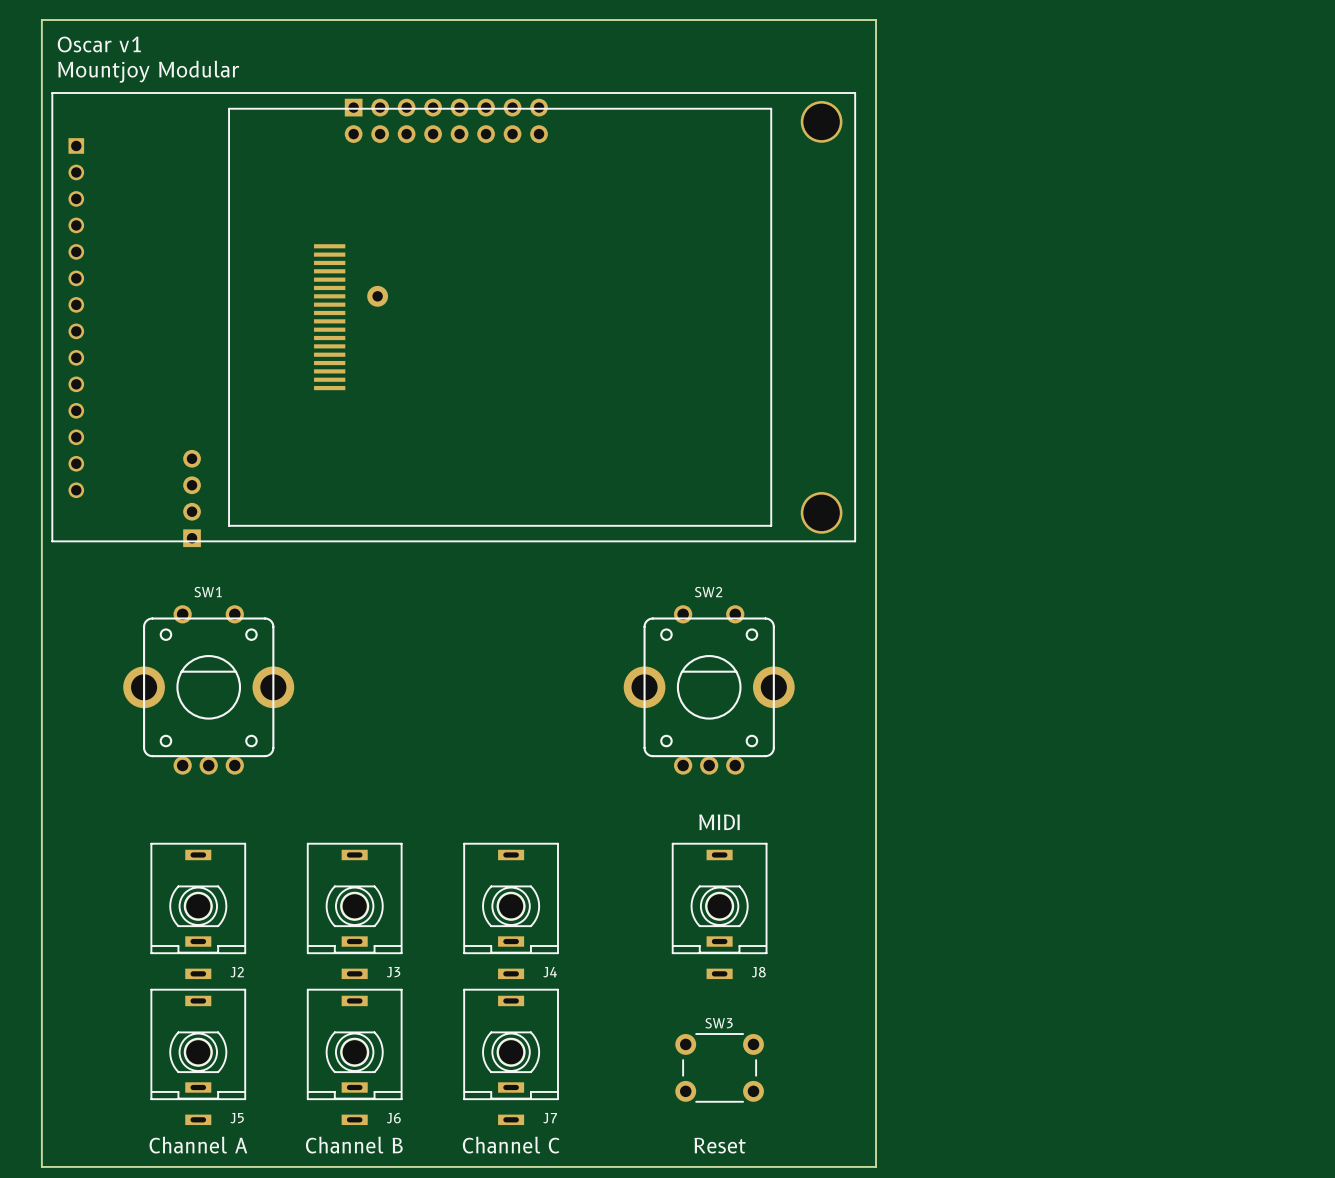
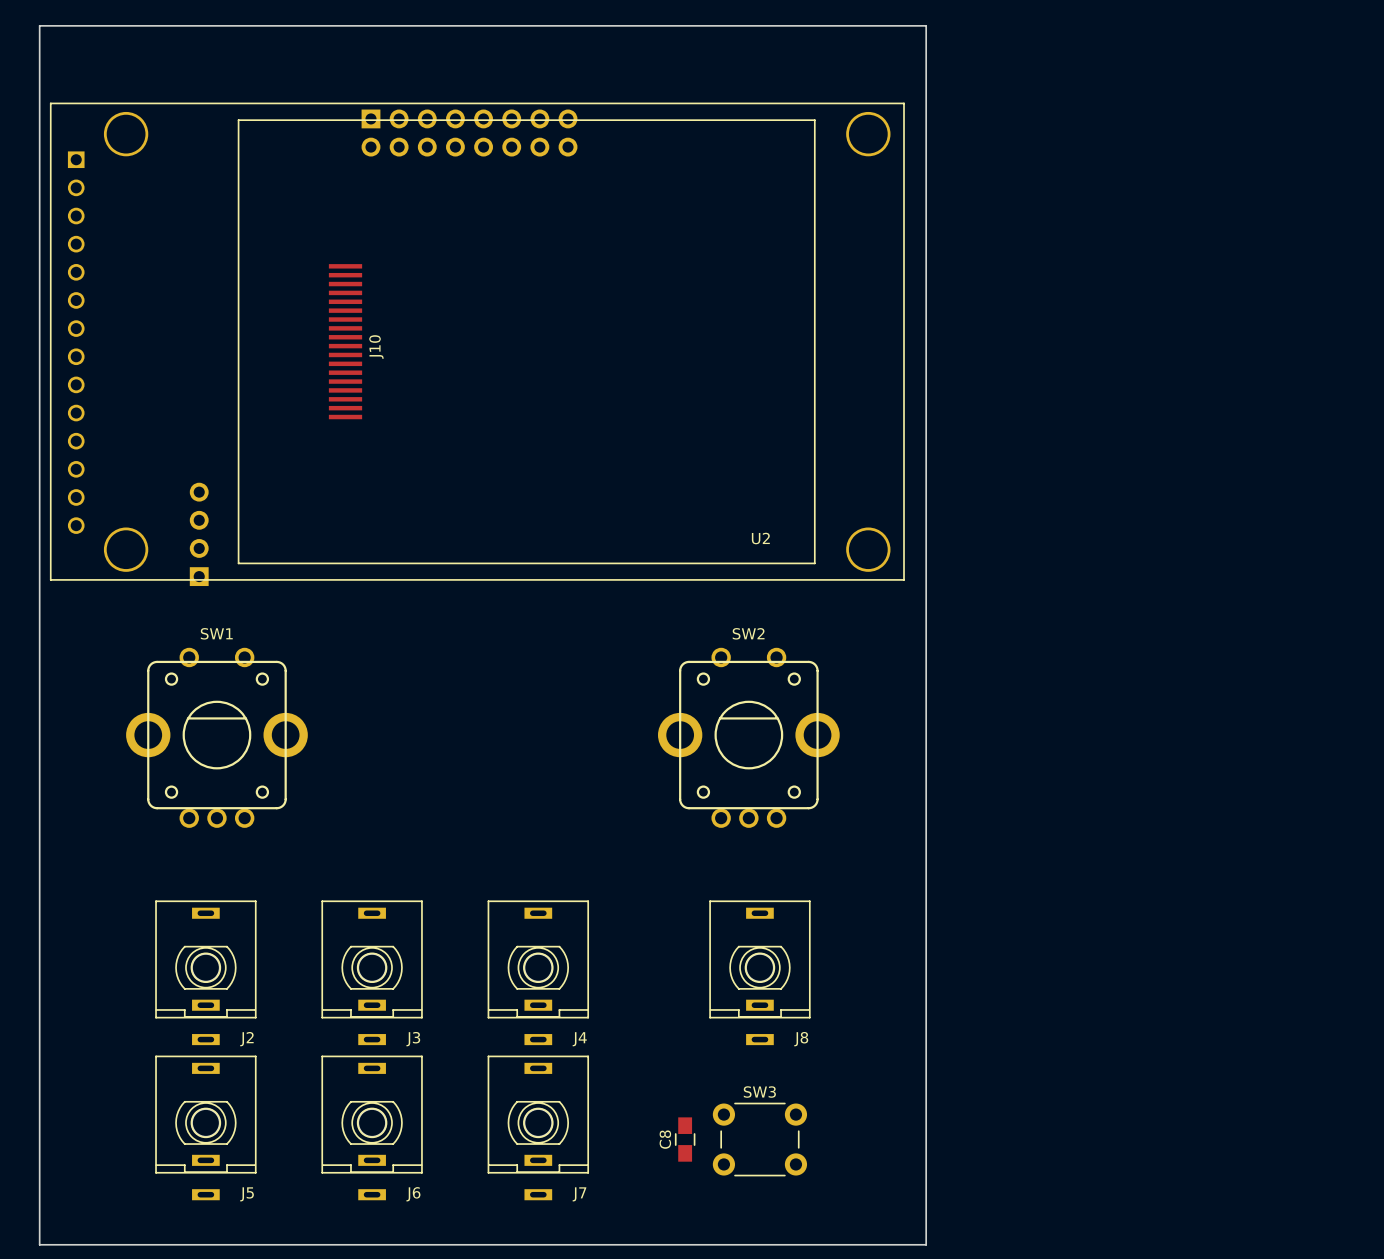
text: Oscar v1 (99, 44) -> none
text: Mountjoy Modular (148, 71) -> none
part: (377, 296) -> none
U2: none -> (477, 341)
J10 name: none -> J10 (376, 347)
text: MIDI (719, 822) -> none
C8: none -> (685, 1139)
text: Channel A (198, 1145) -> none
text: Channel B (354, 1145) -> none
text: Channel C (511, 1145) -> none
text: Reset (720, 1145) -> none

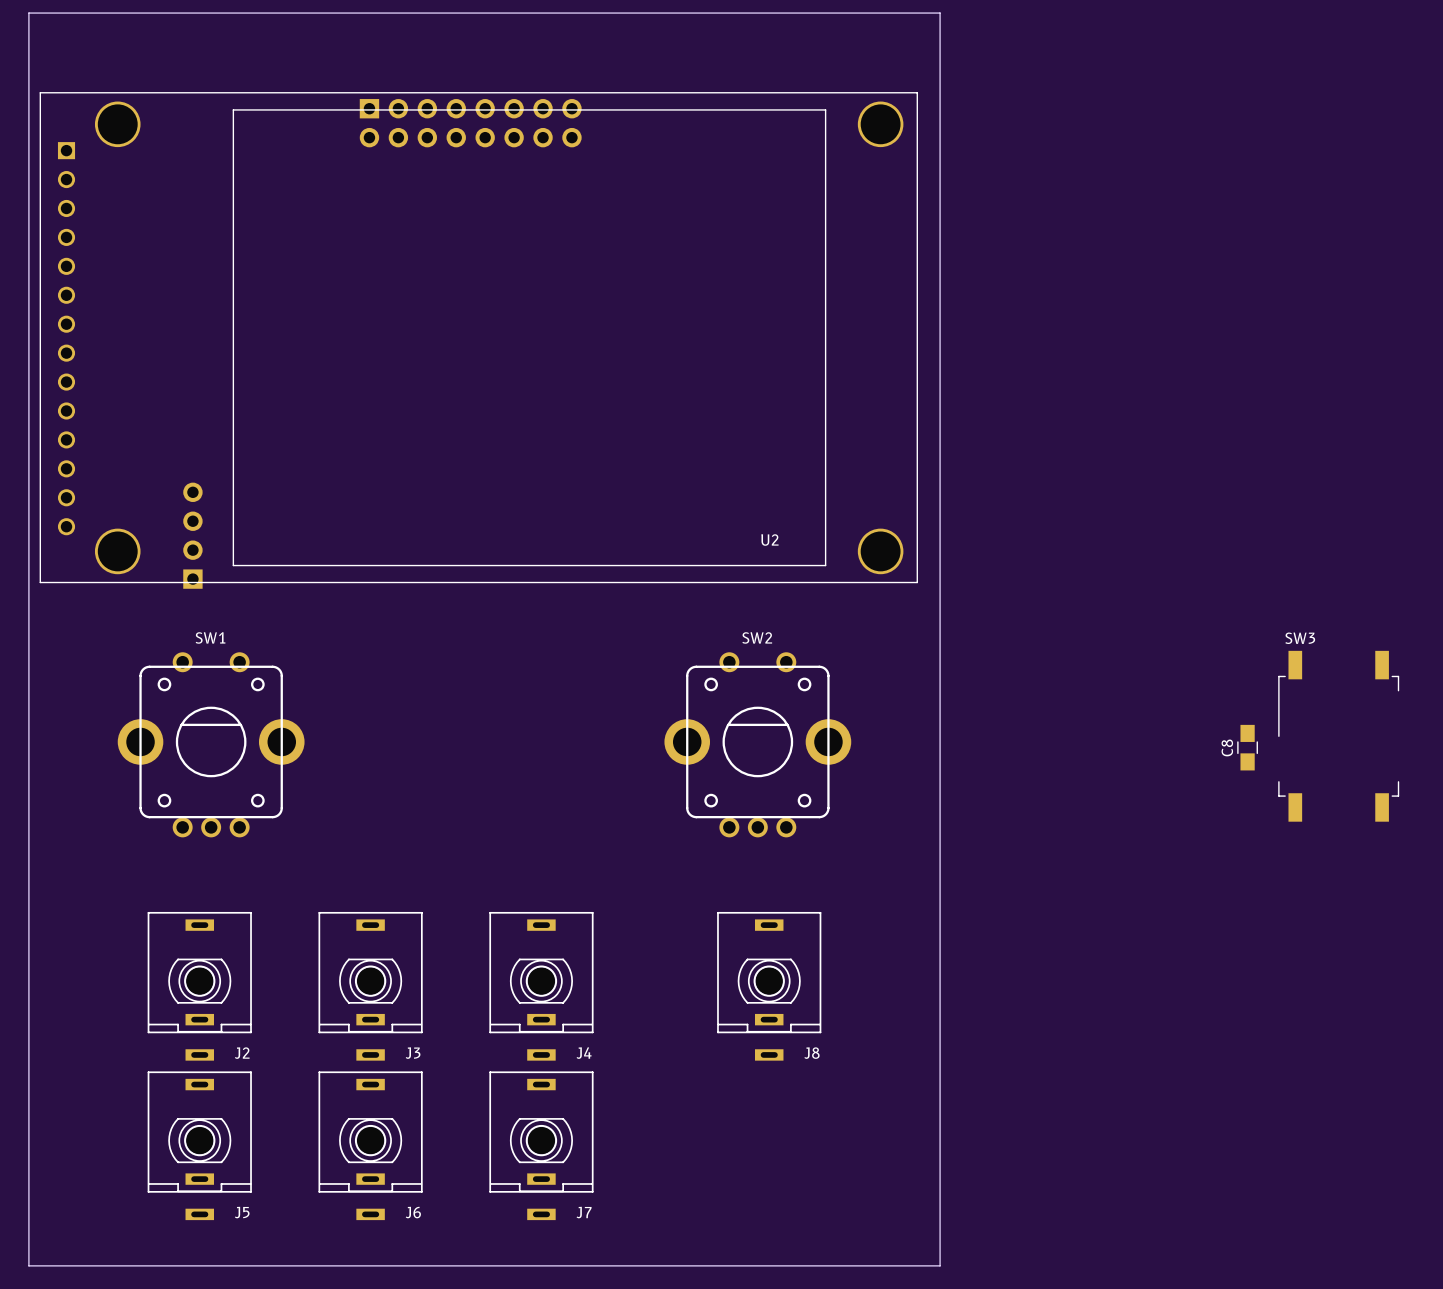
J10: (345, 341) -> none
SW3 name position: SW3 (759, 1092) -> SW3 (1300, 638)
SW3 footprint: [712, 1102, 808, 1177] -> [1278, 650, 1400, 822]
C8 position: (685, 1139) -> (1247, 747)

